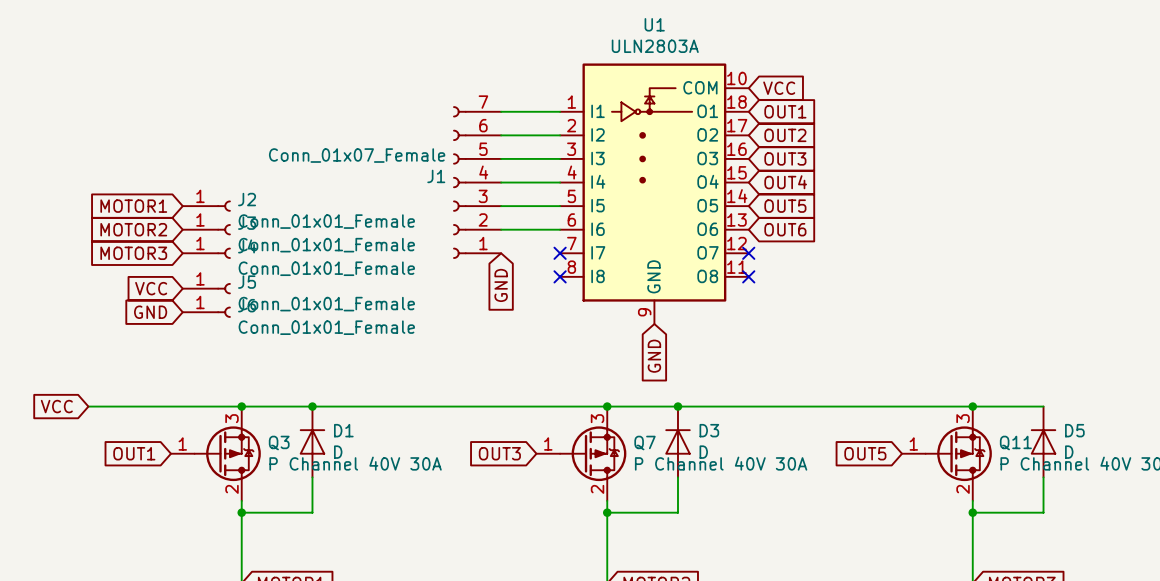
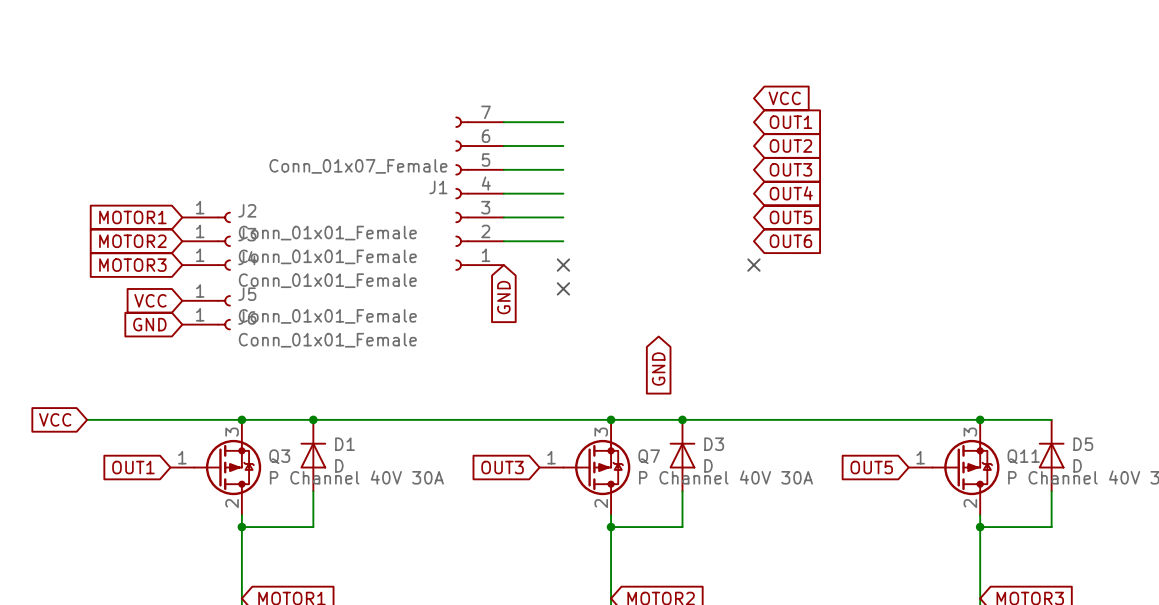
U1: ULN2803A (654, 193) -> none
no-connect mark: (748, 276) -> none

